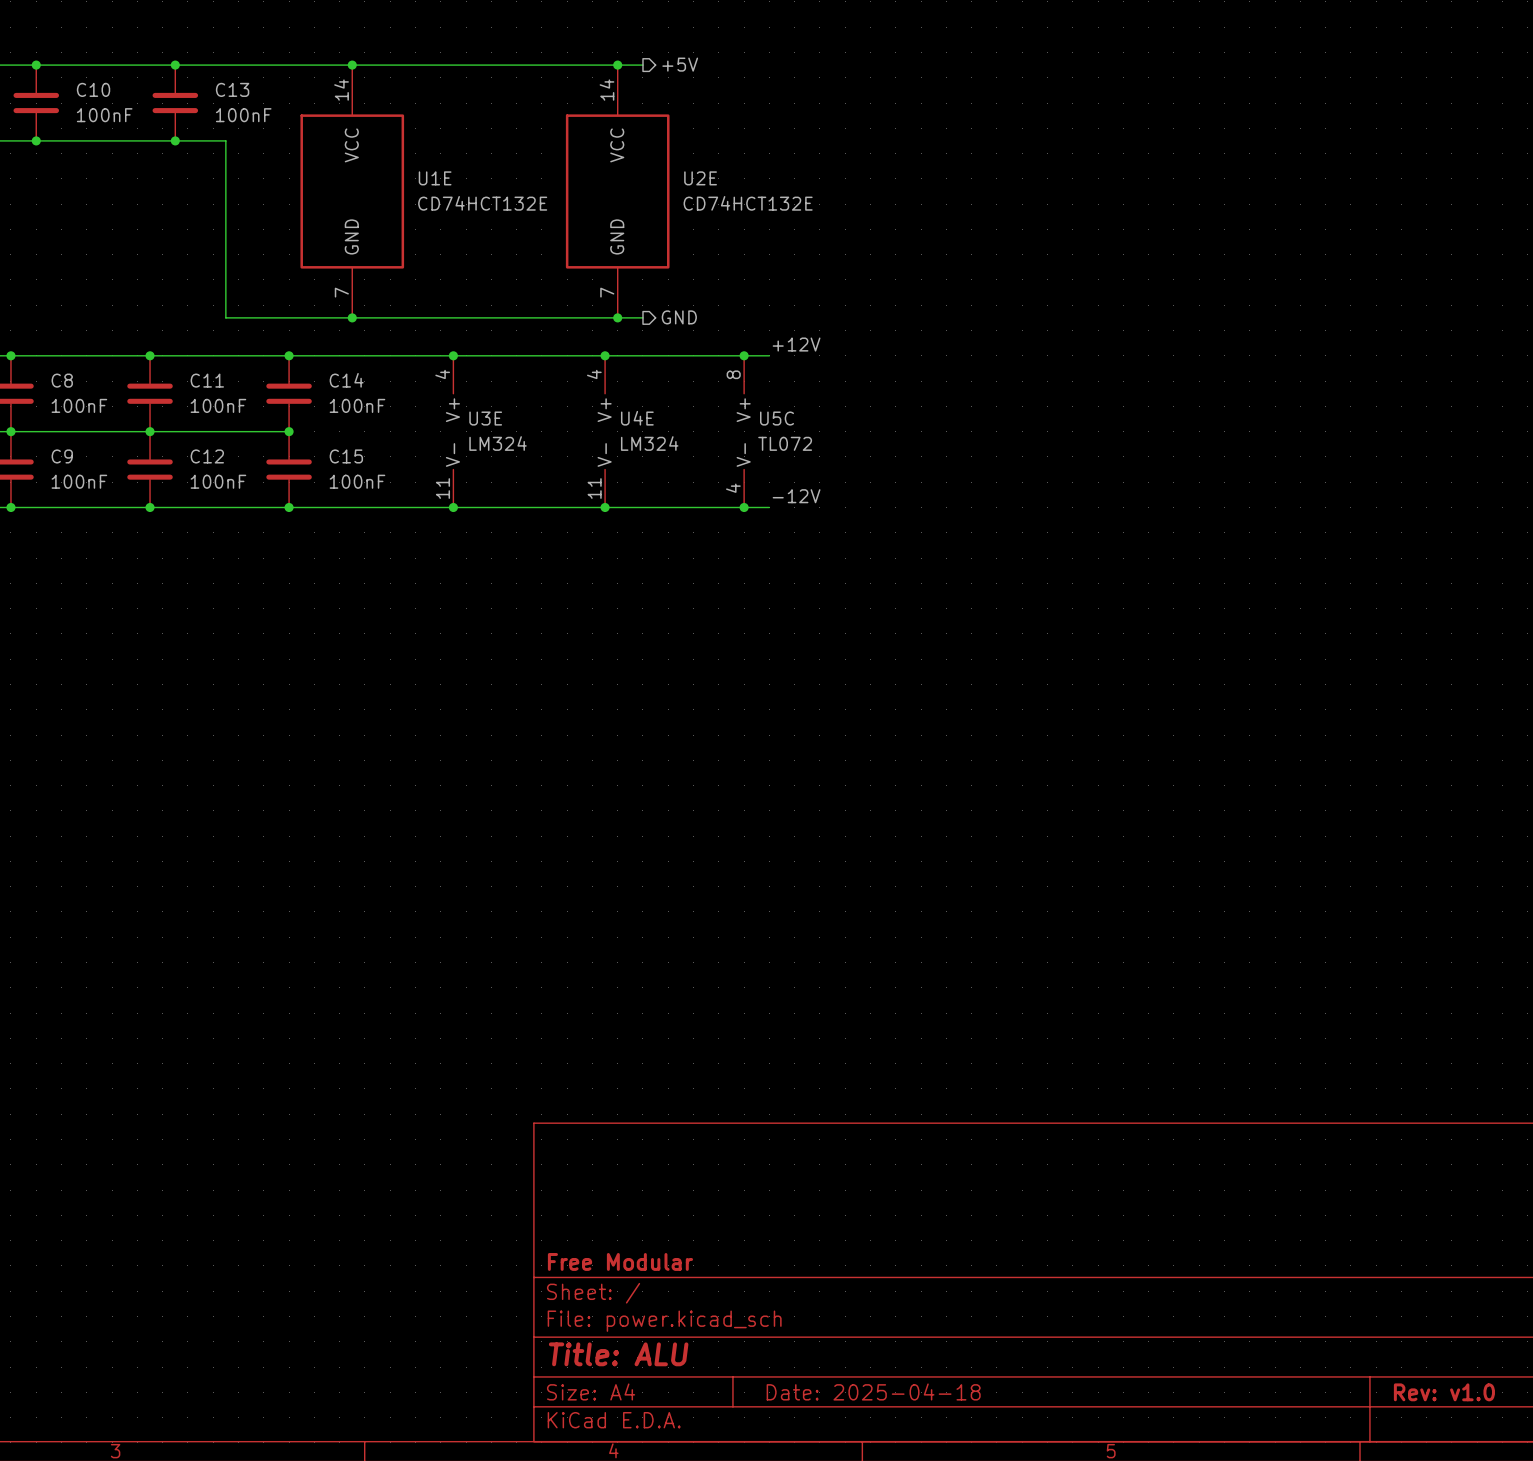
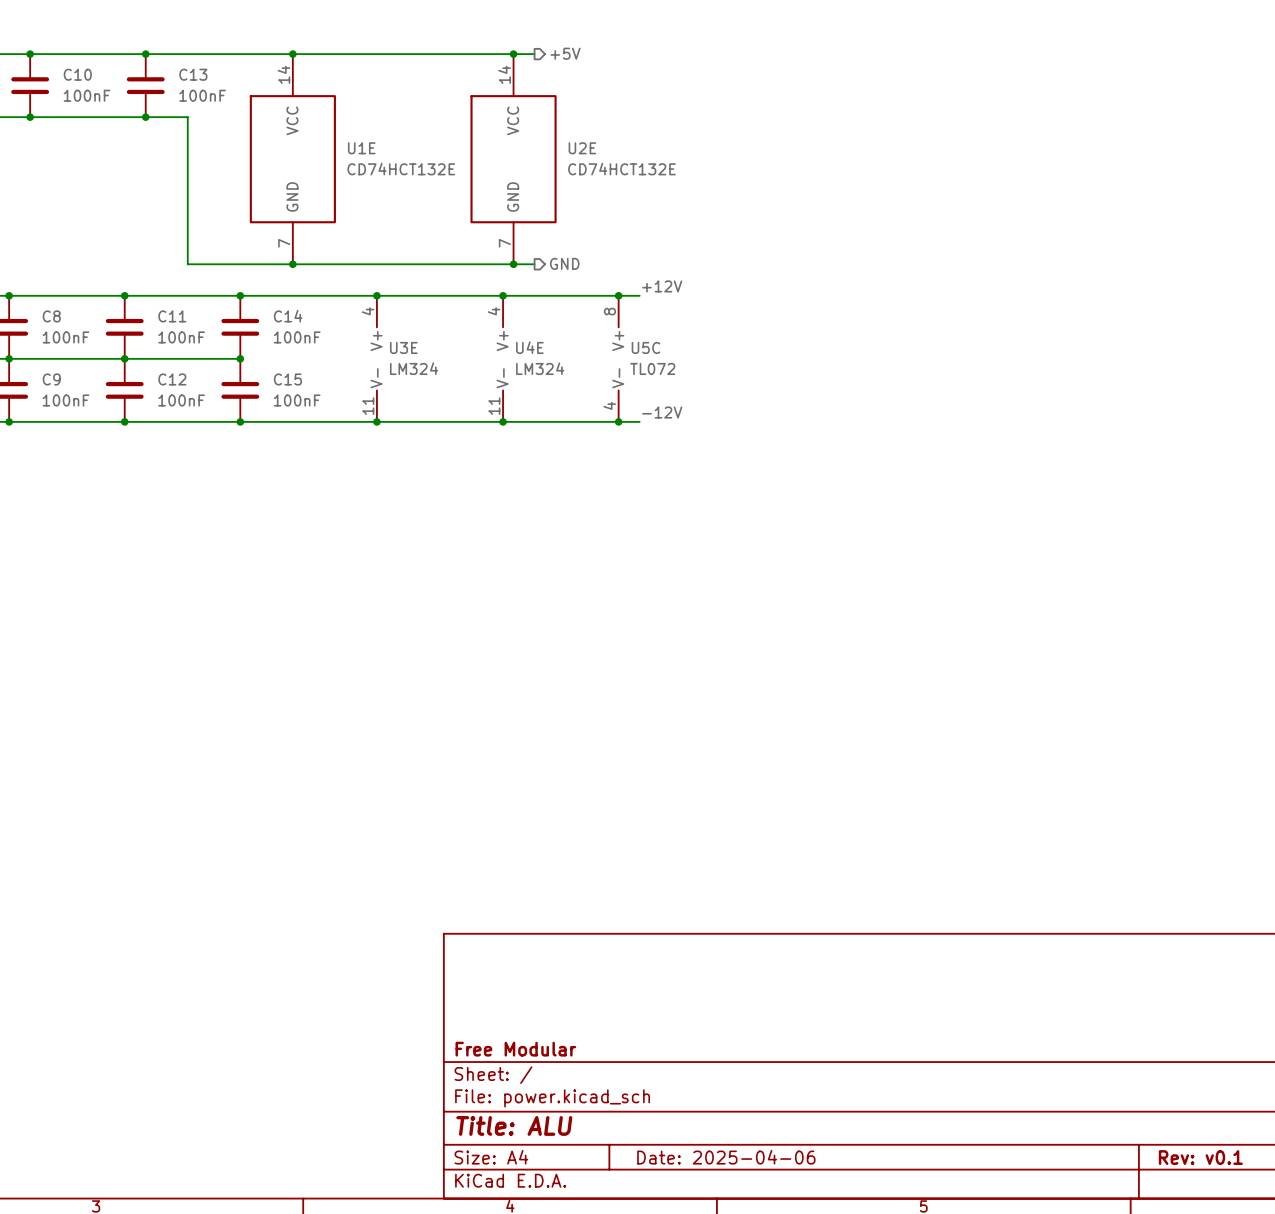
title block: Date: 2025-04-18 (873, 1391) -> Date: 2025-04-06 (726, 1157)
title block: Rev: v1.0 (1444, 1392) -> Rev: v0.1 (1200, 1157)

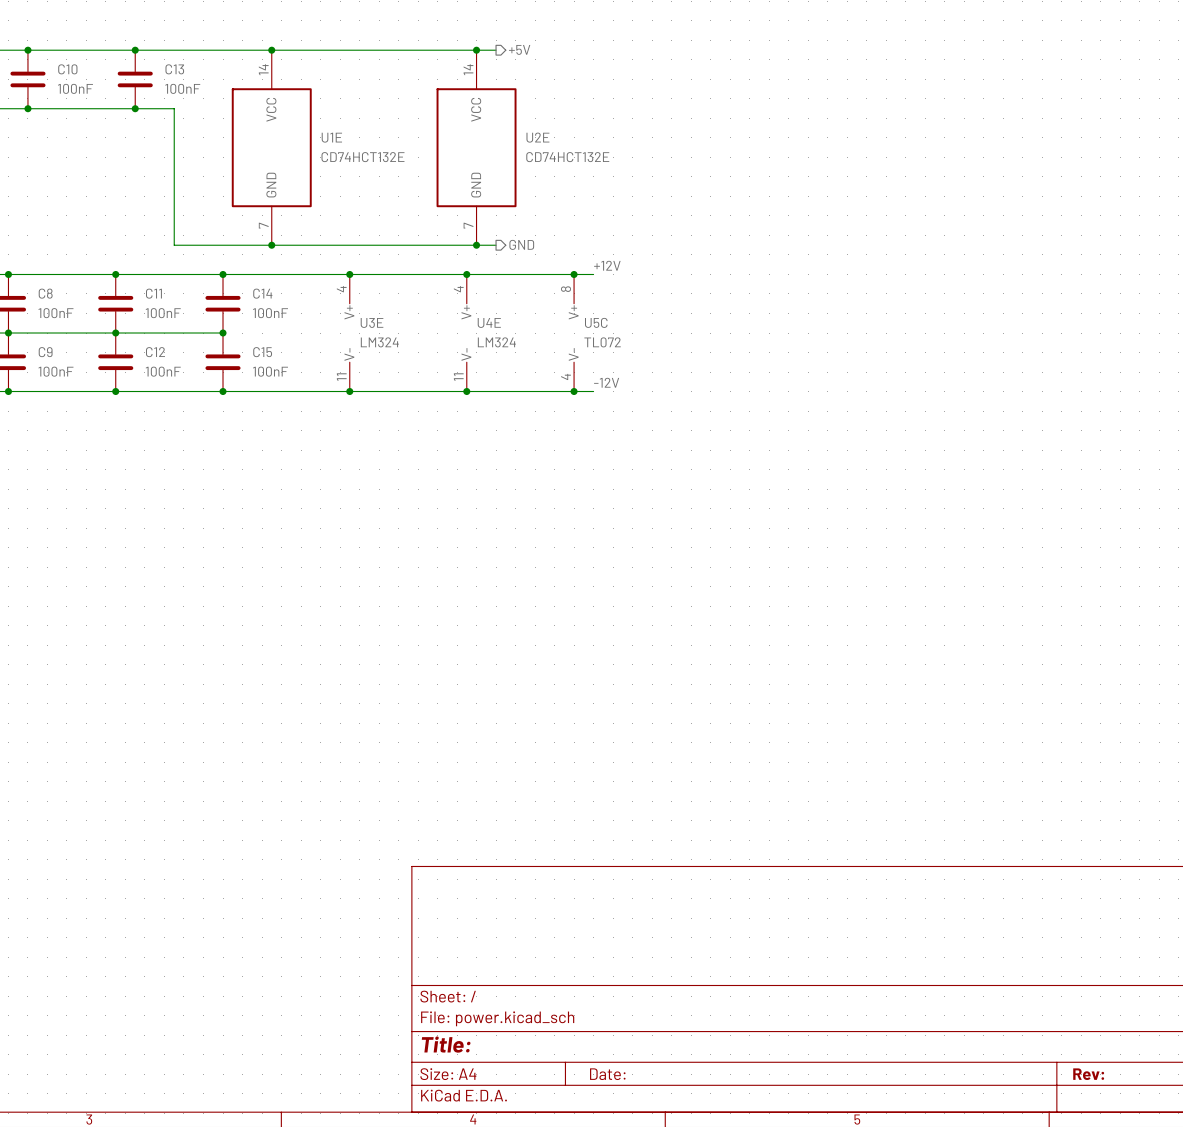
title block: Free Modular (515, 1049) -> none
title block: Title: ALU (514, 1125) -> Title: (446, 1044)
title block: Date: 2025-04-06 (726, 1157) -> Date: (607, 1074)
title block: Rev: v0.1 (1200, 1157) -> Rev: (1088, 1074)

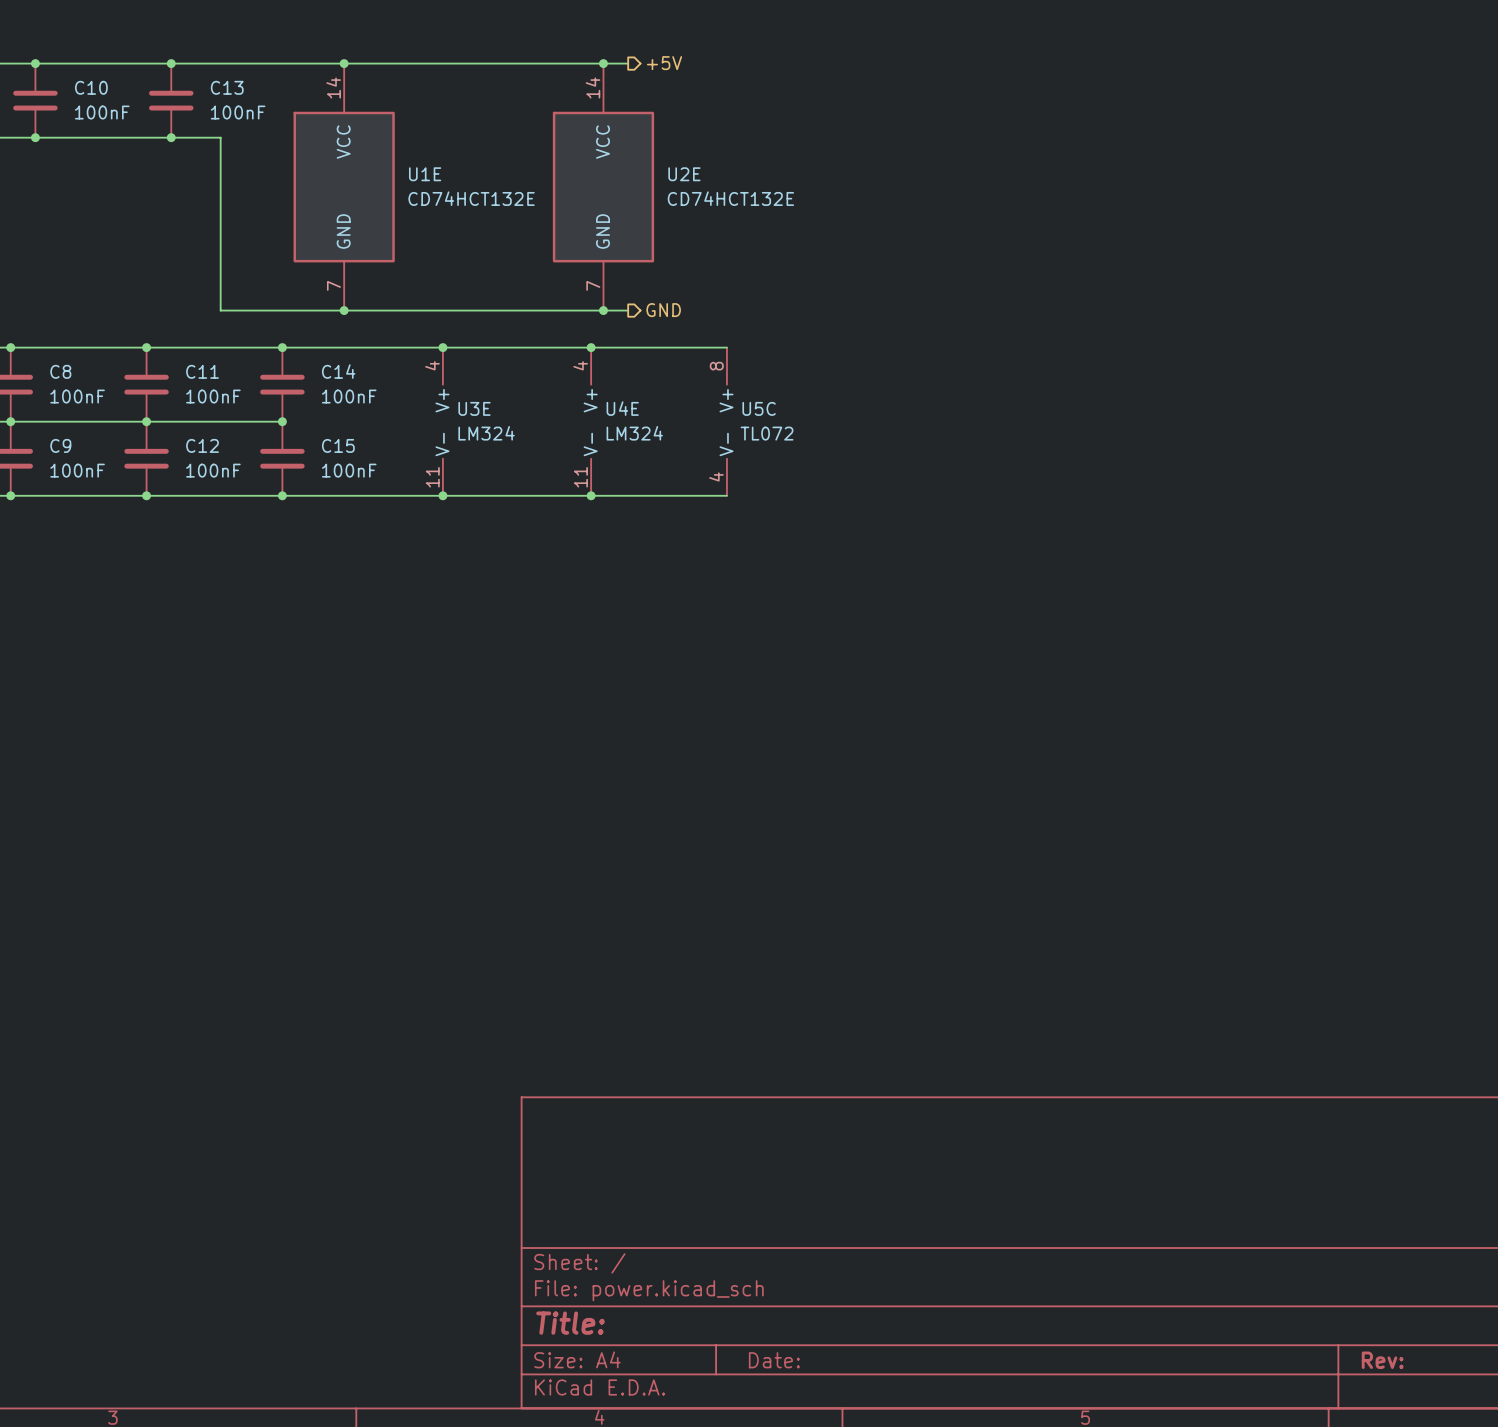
label: +12V (607, 265) -> none
wire: (574, 274) (593, 274) -> none
junction: (574, 274) -> none
label: -12V (606, 382) -> none
wire: (574, 391) (593, 391) -> none
junction: (574, 391) -> none

